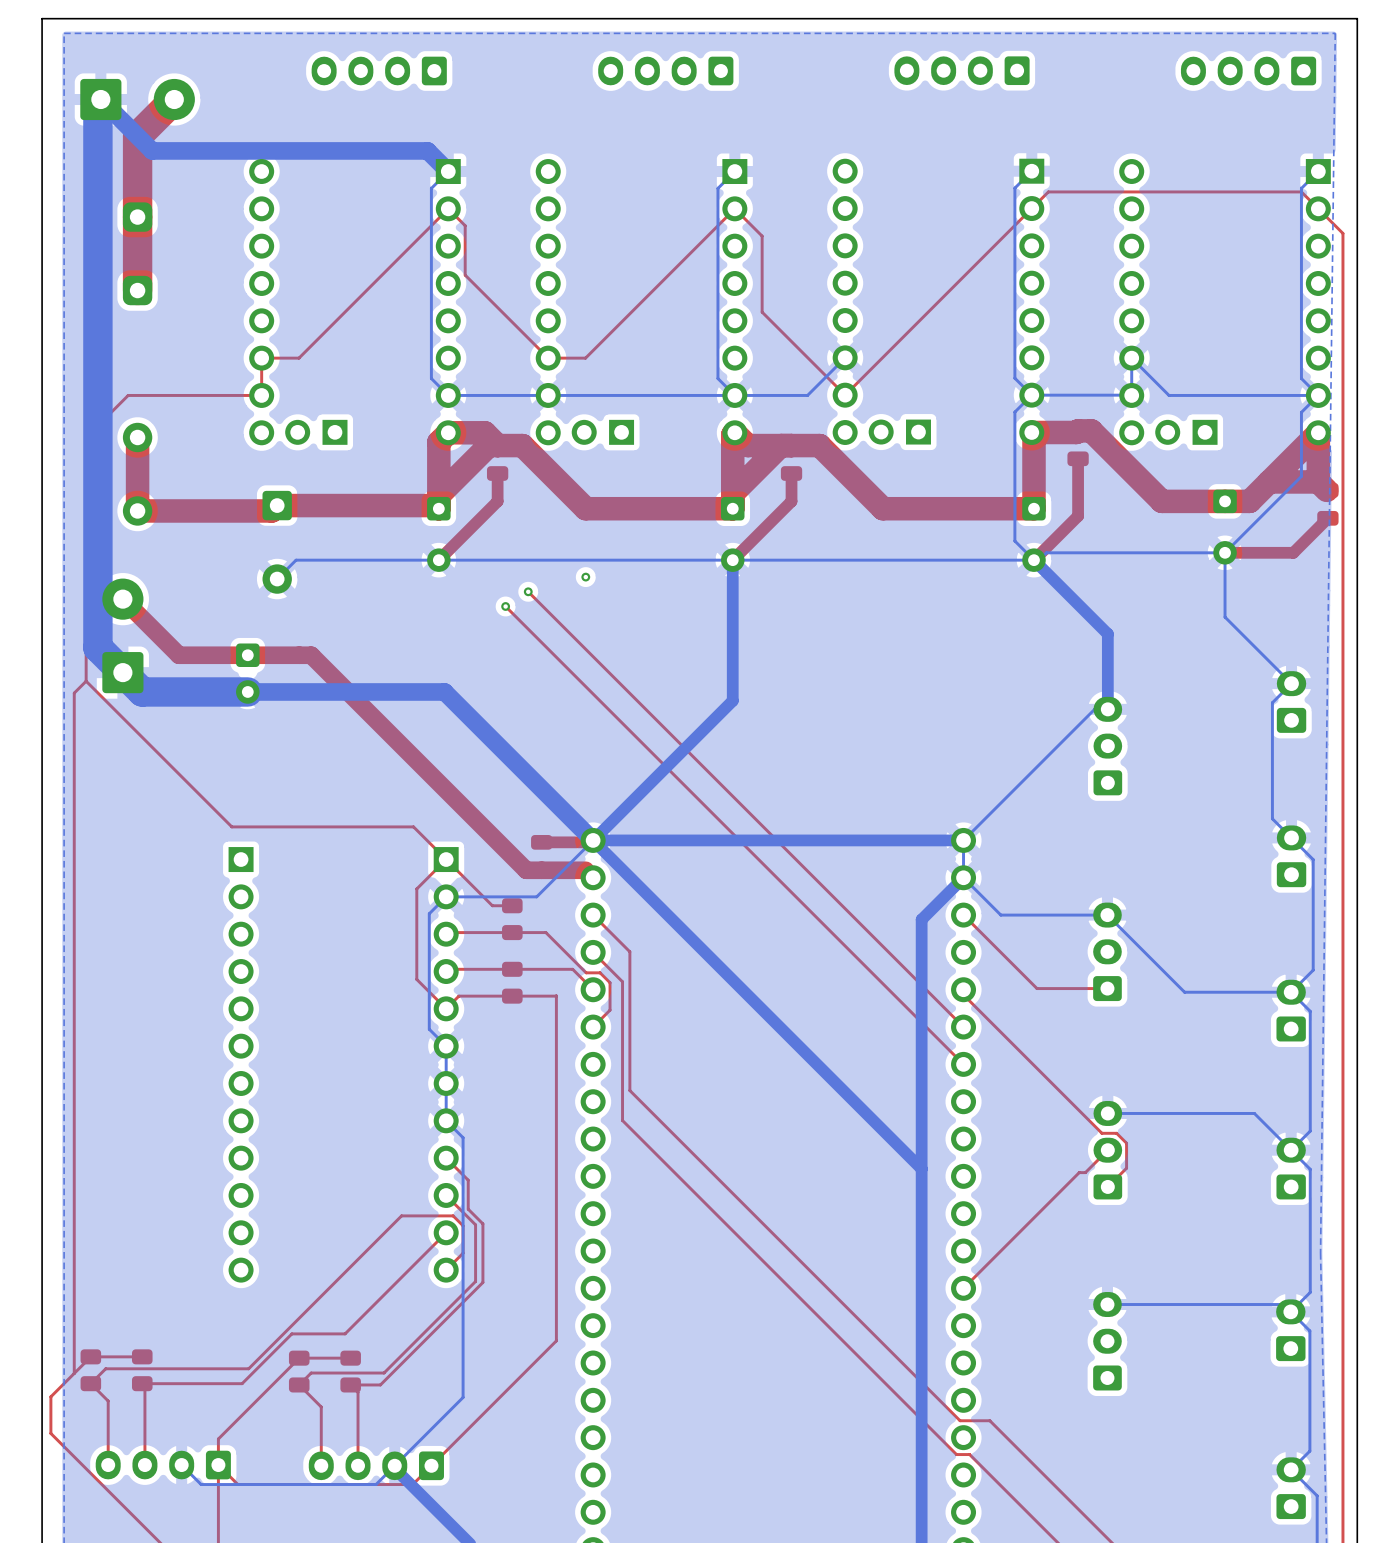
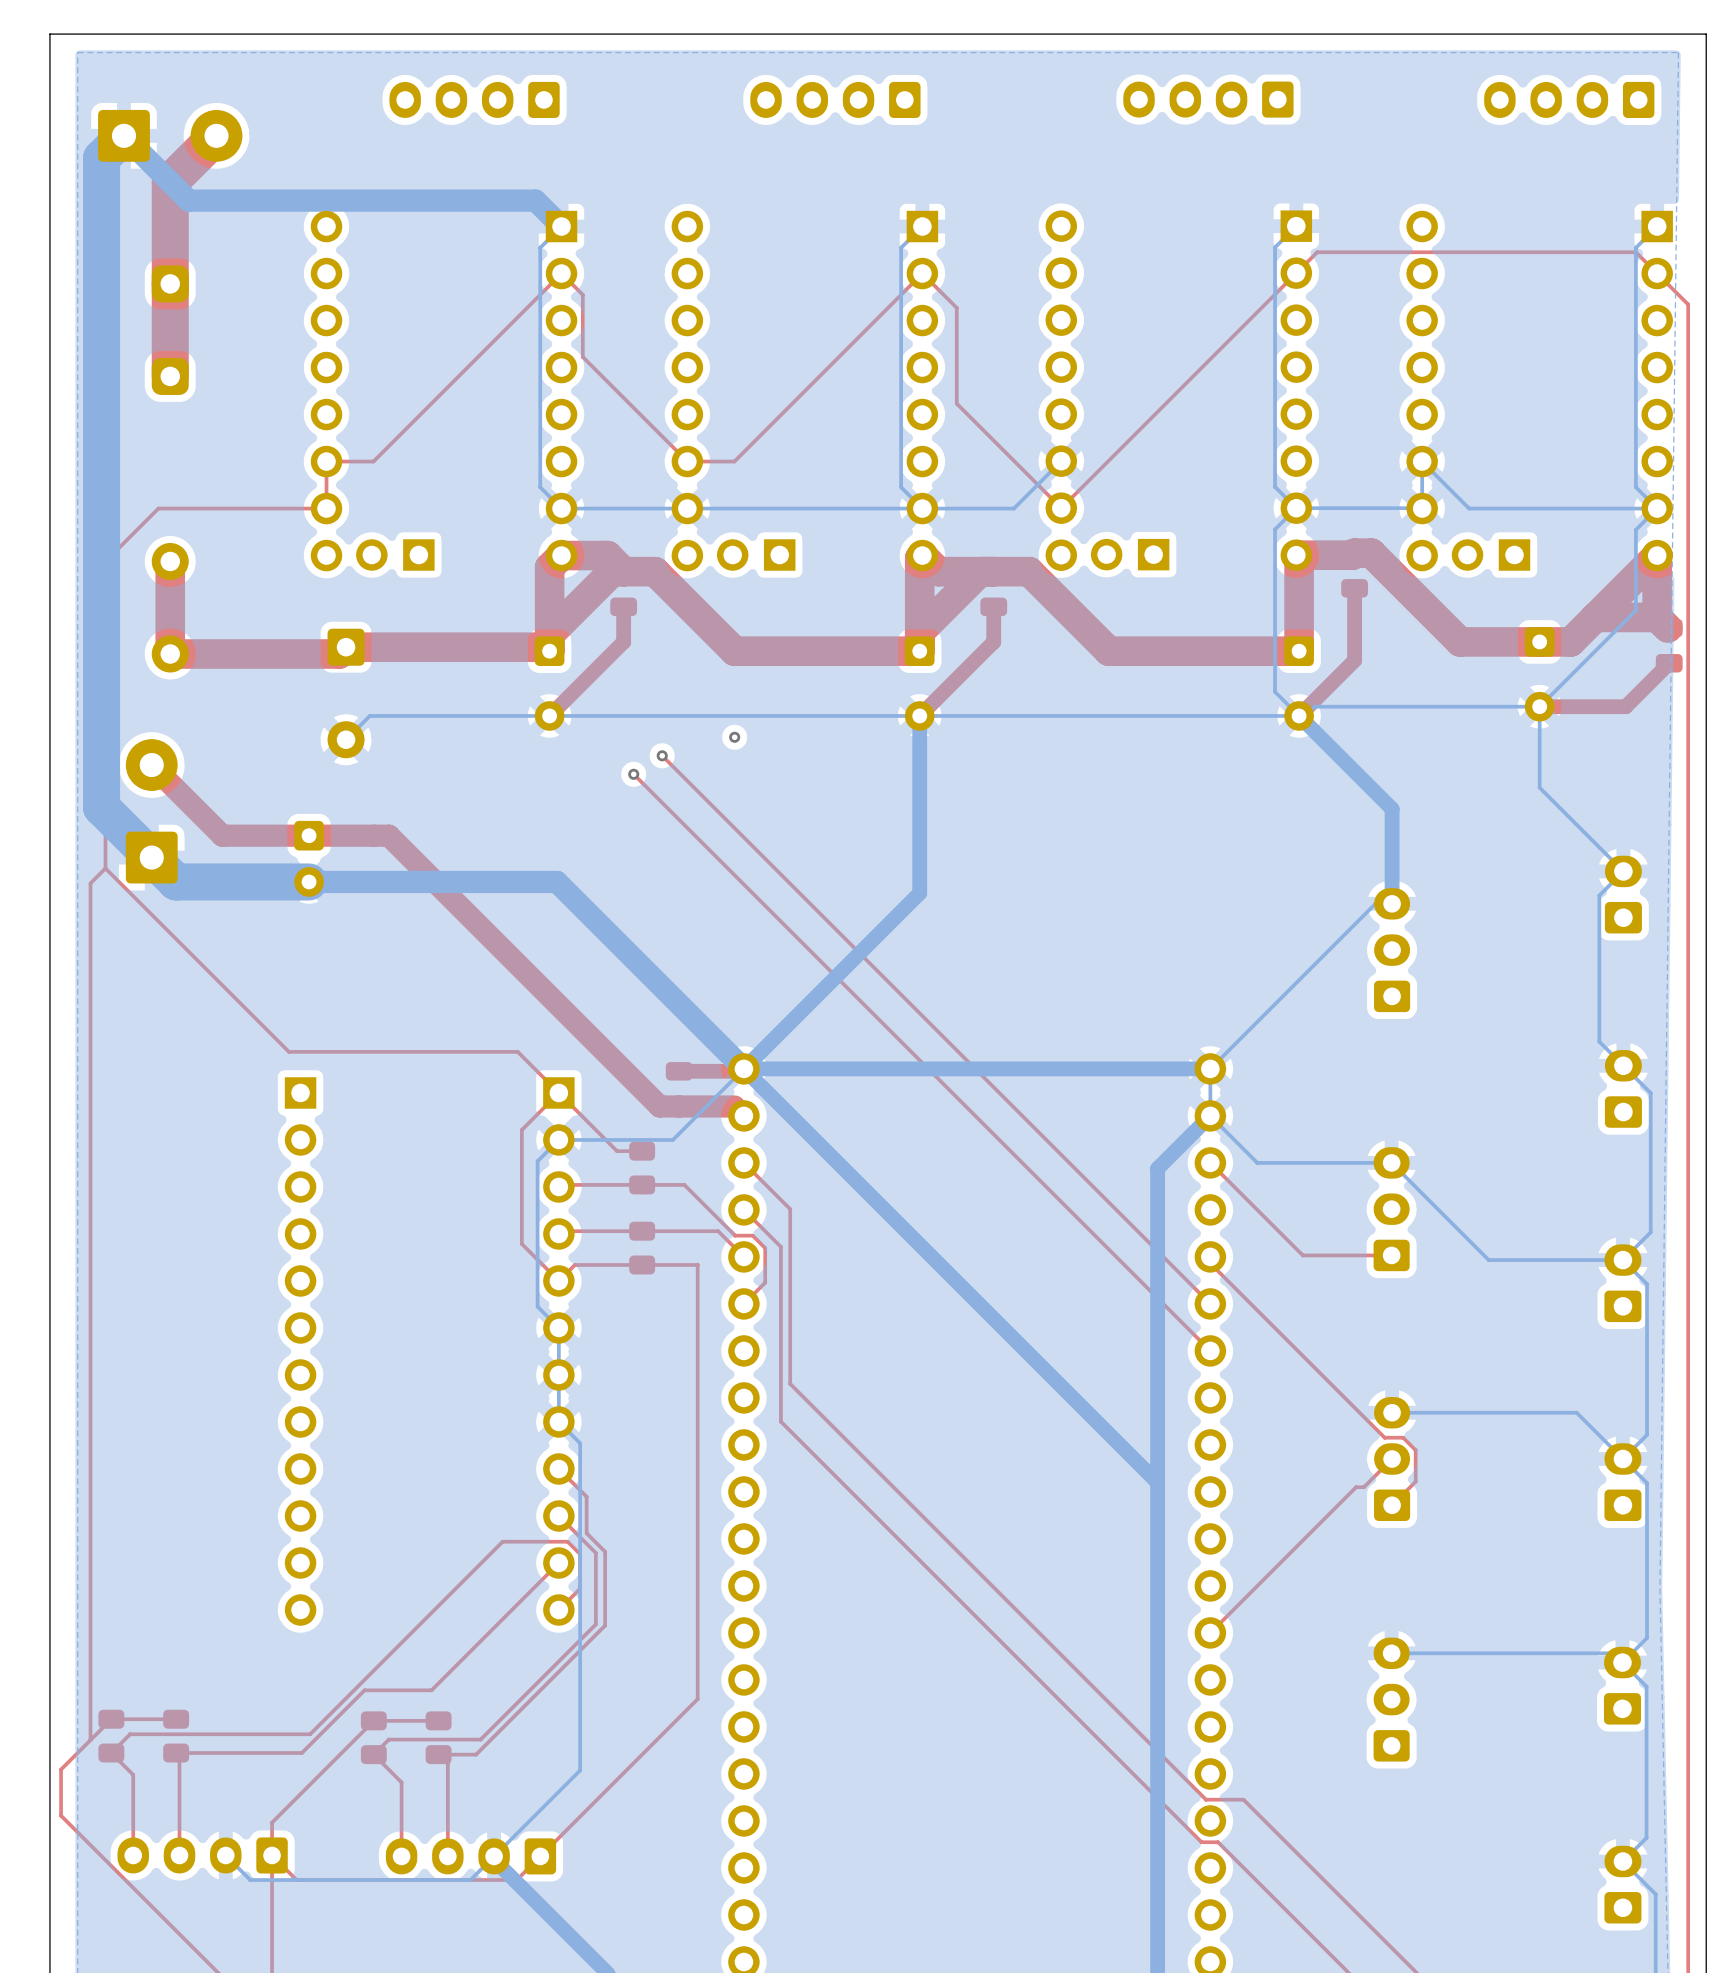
bottom track: (97, 102) (97, 647) -> (120, 139) (101, 158) (101, 807) (120, 826)

